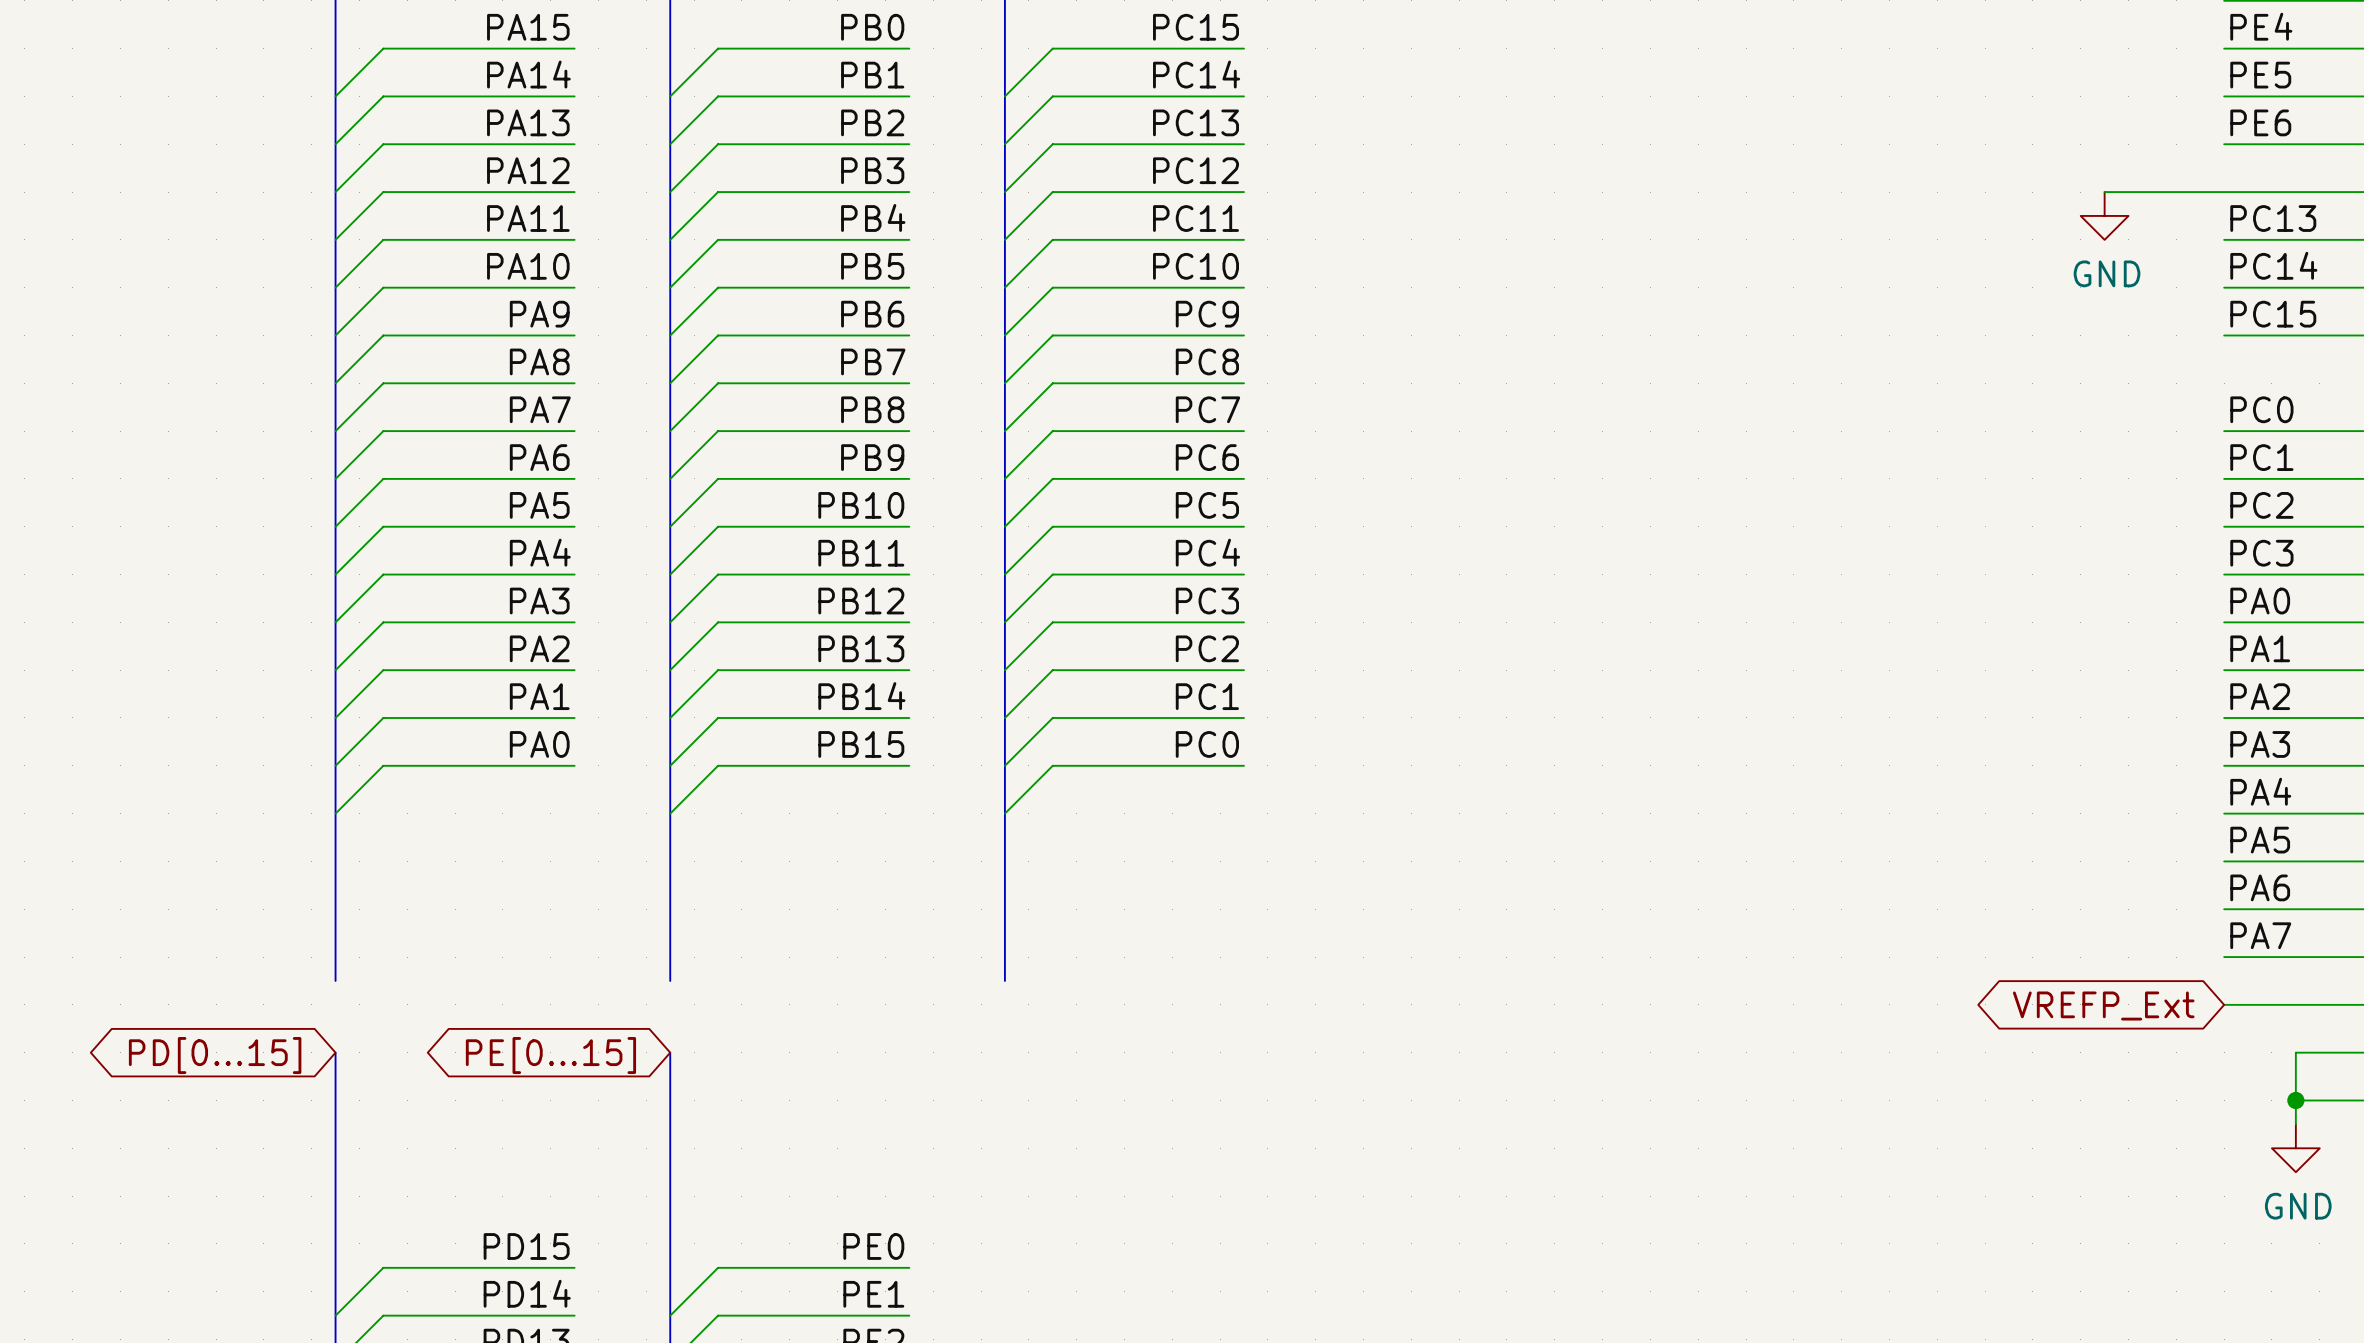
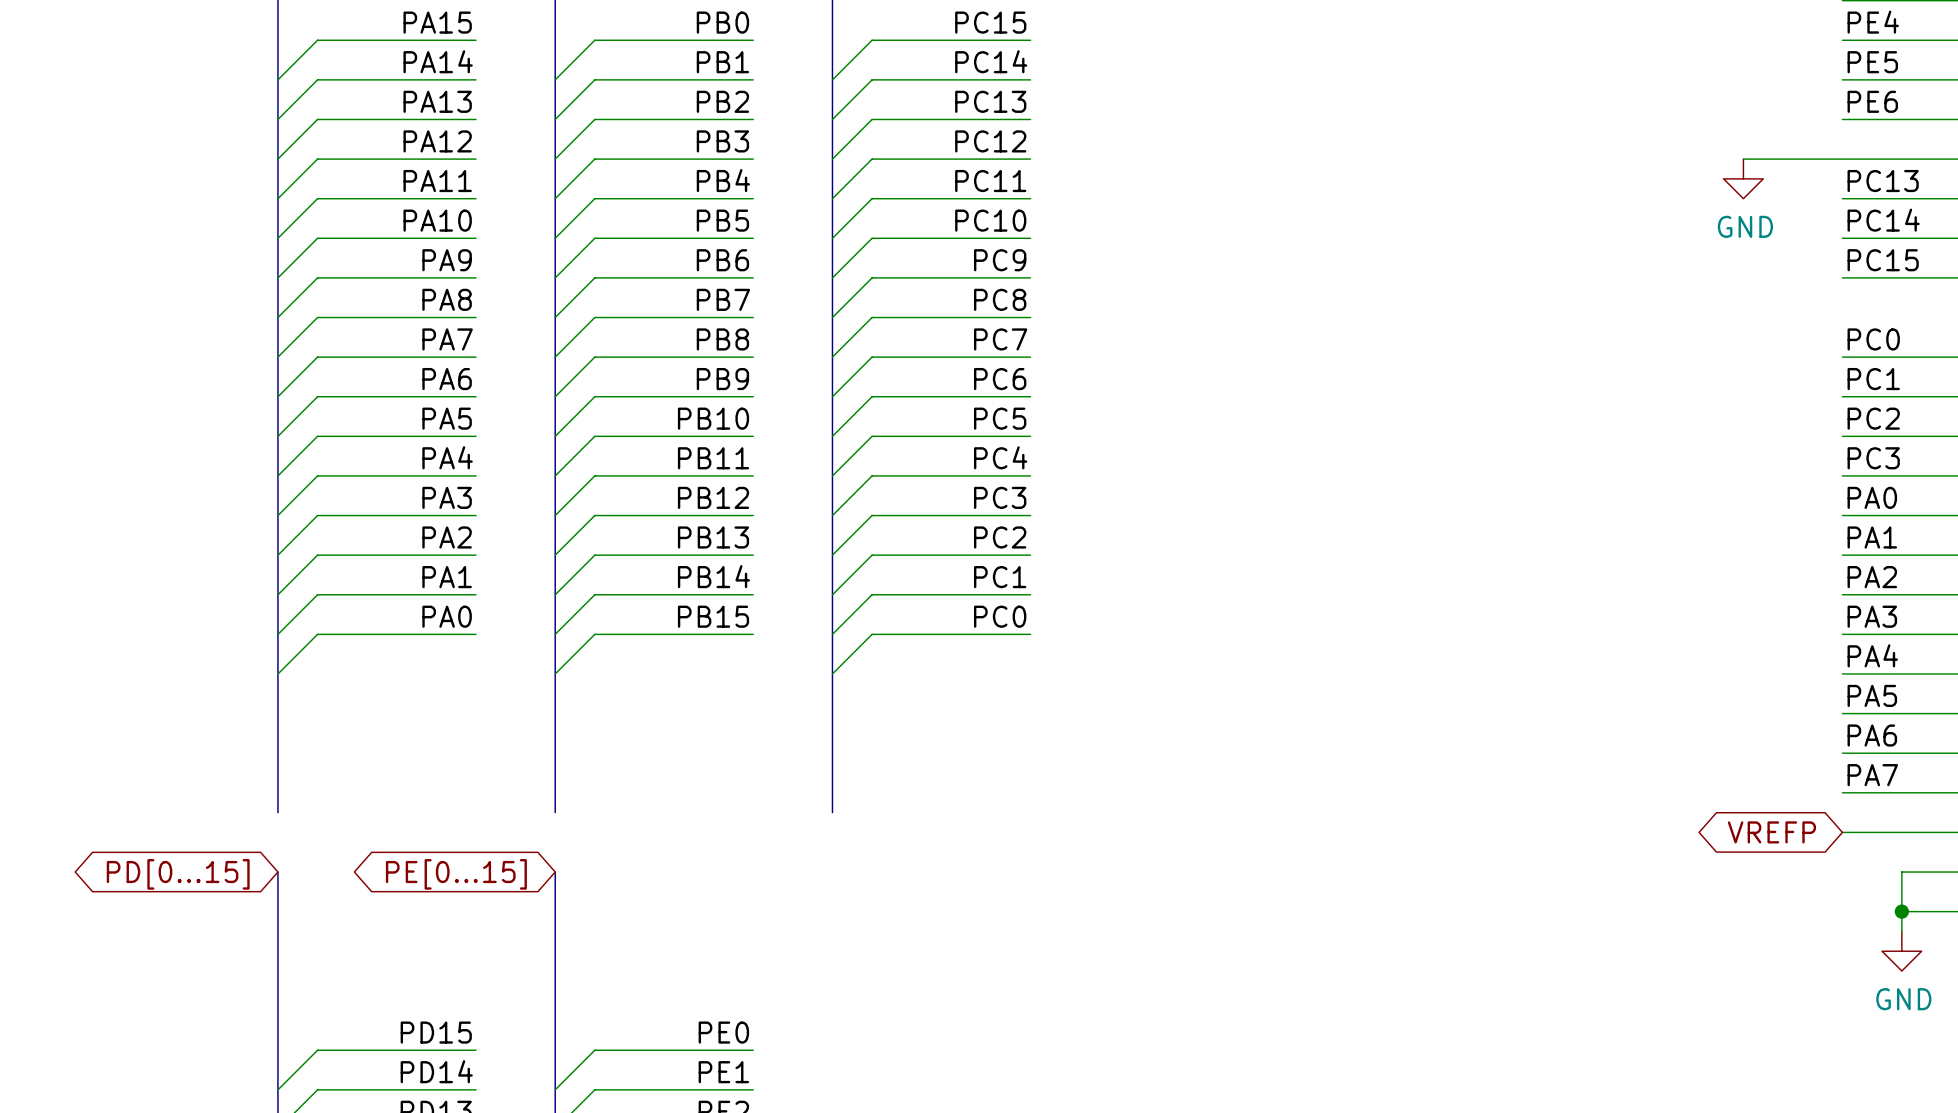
global label: VREFP_Ext (2103, 1006) -> VREFP (1771, 832)

